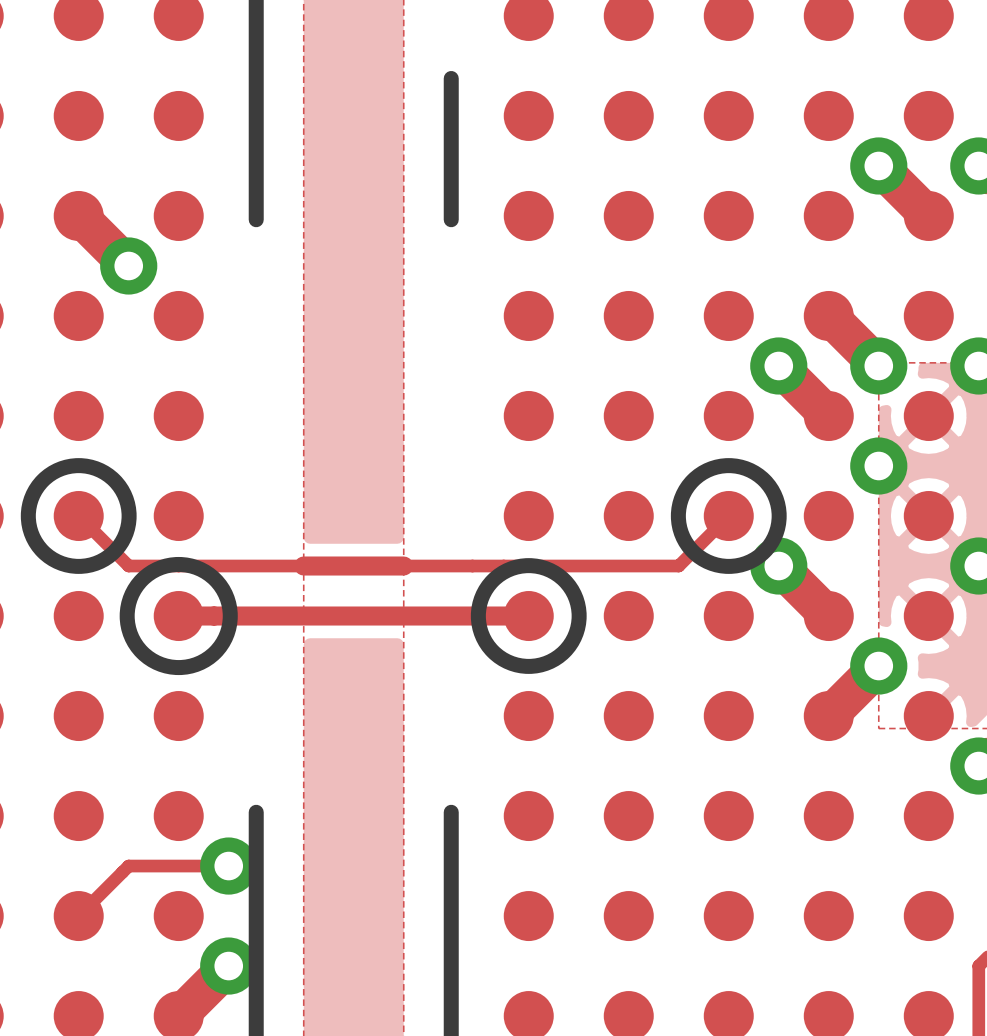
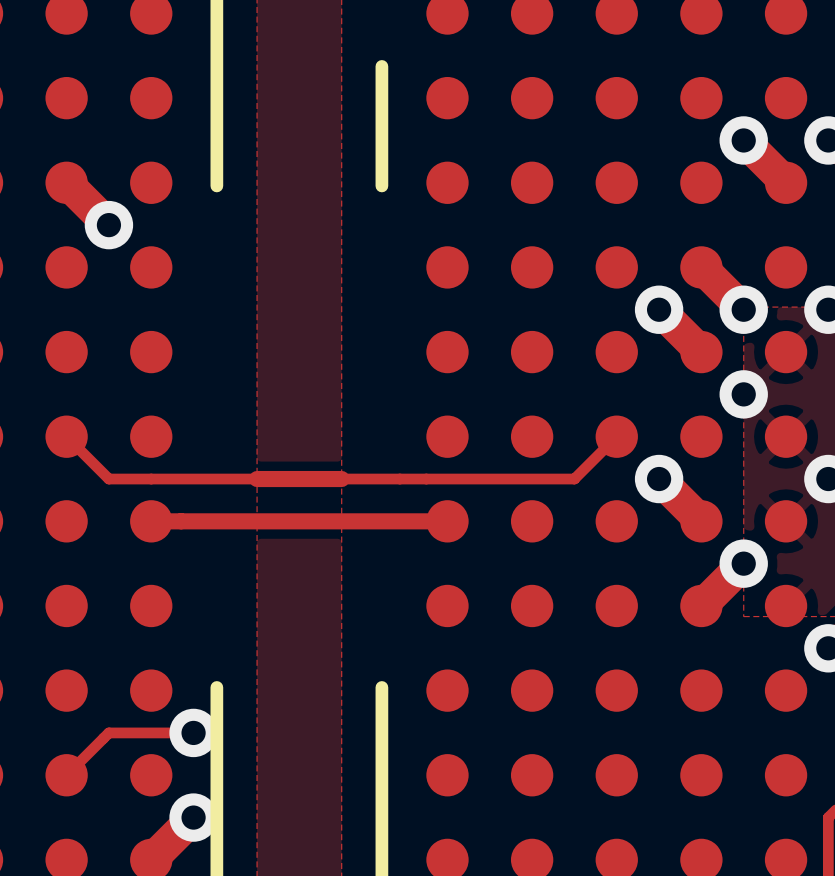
drawing: [20, 458, 238, 676] -> none
drawing: [470, 458, 787, 674] -> none

